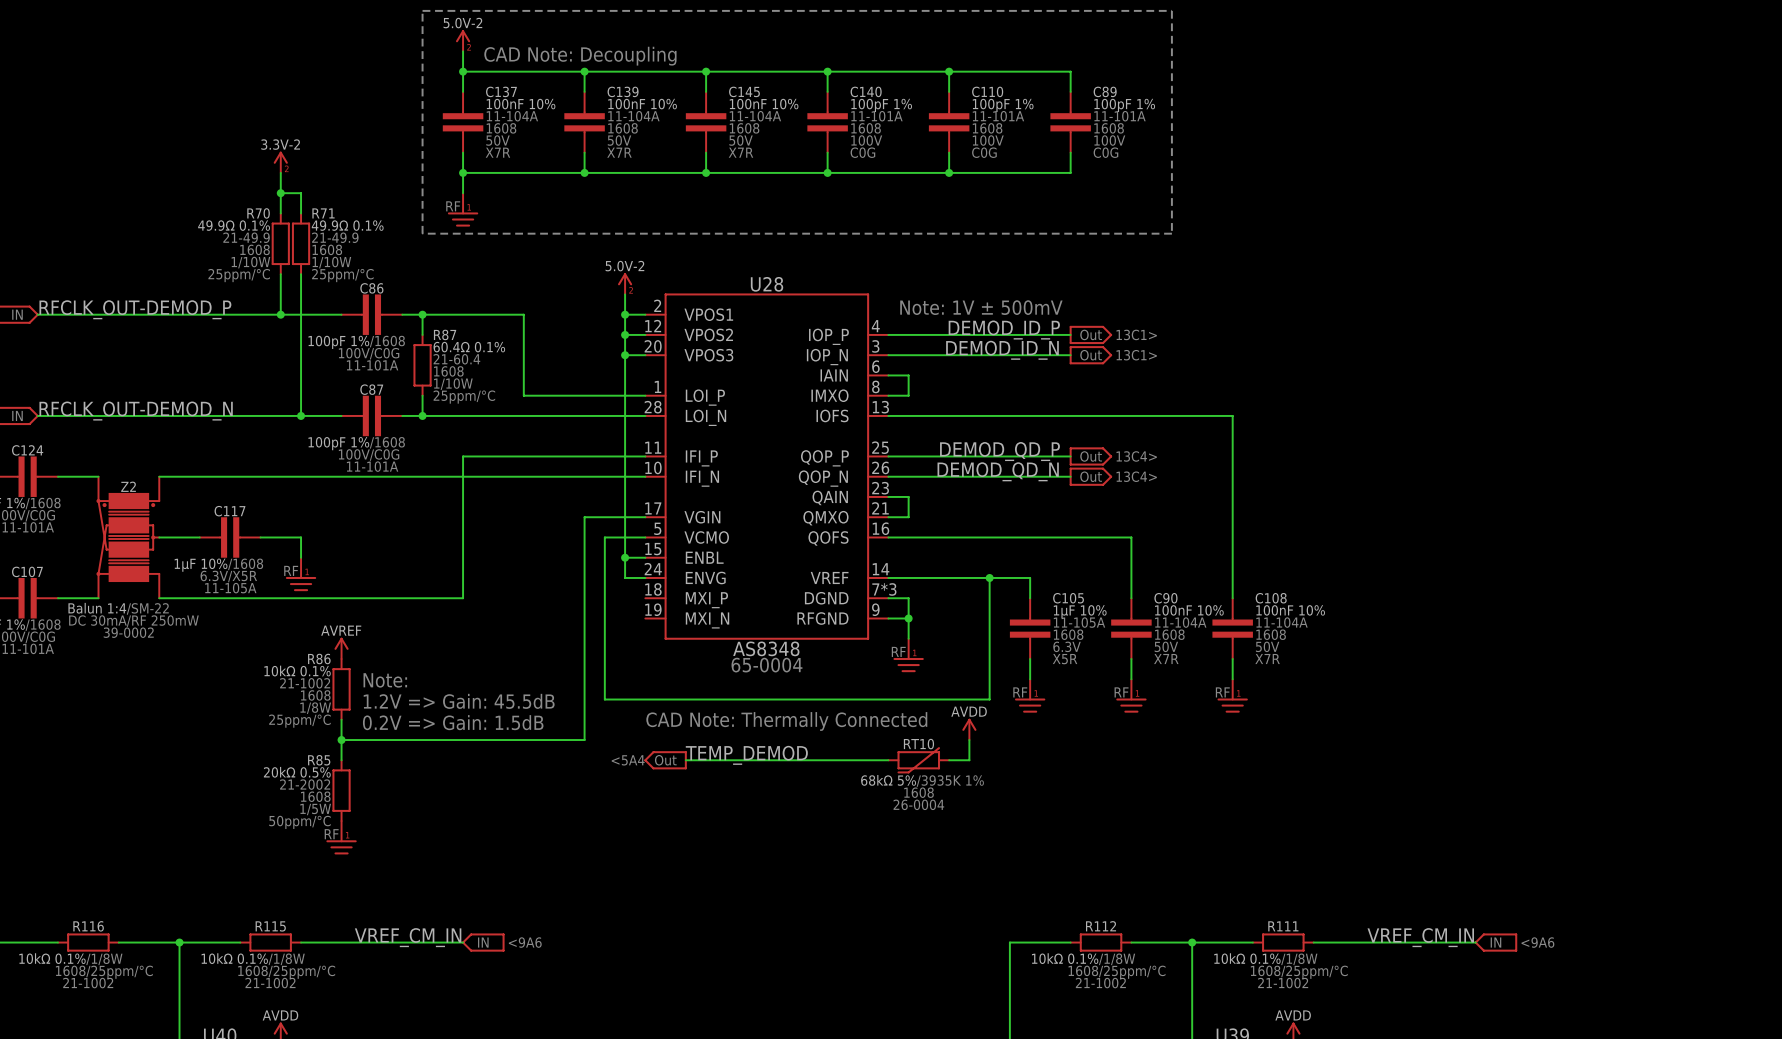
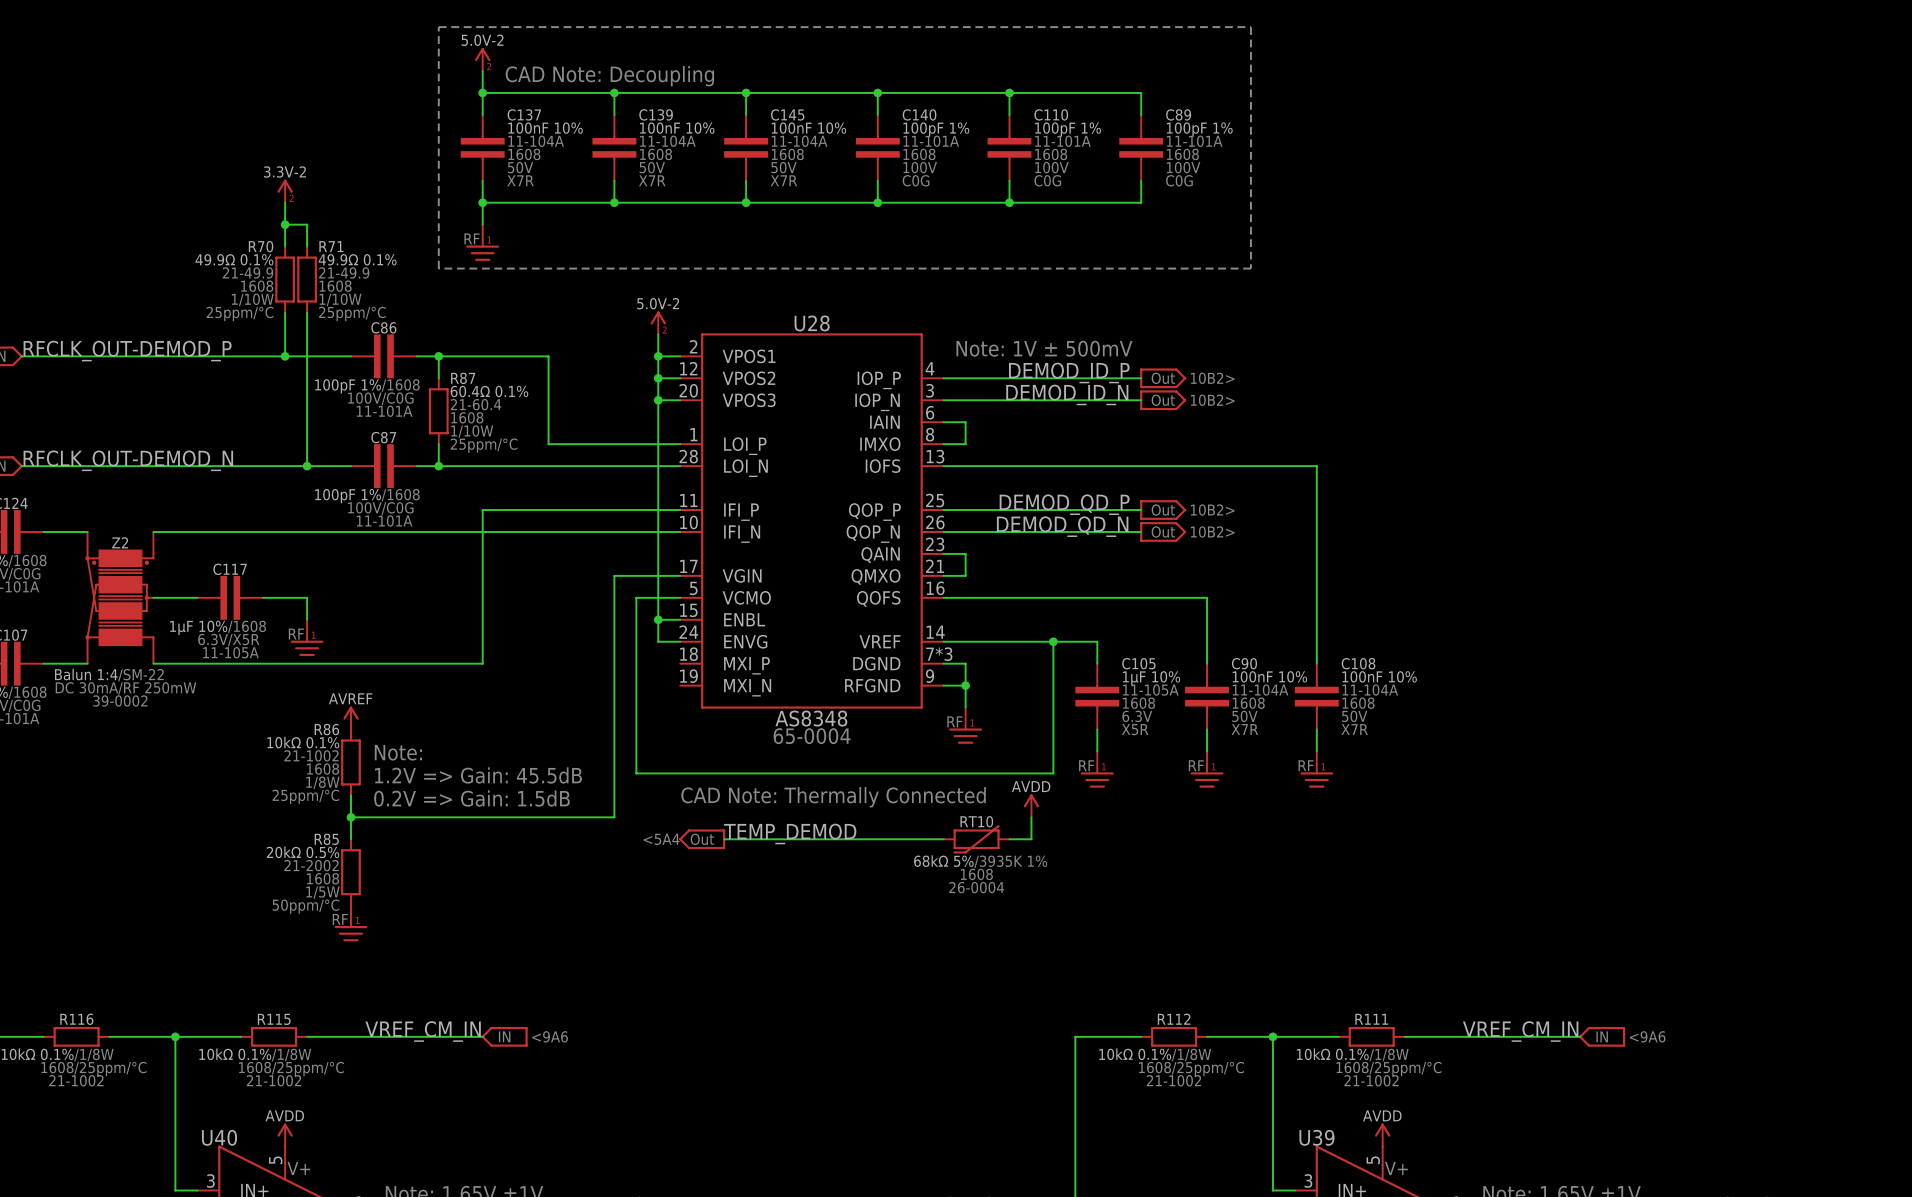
text: 13C1> (1136, 334) -> 10B2> (1212, 378)
text: 13C1> (1136, 355) -> 10B2> (1212, 400)
text: 13C4> (1136, 456) -> 10B2> (1212, 510)
text: 13C4> (1136, 476) -> 10B2> (1212, 531)

